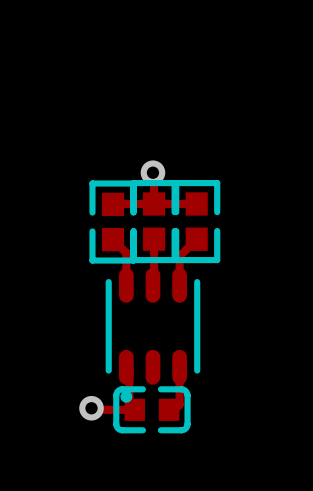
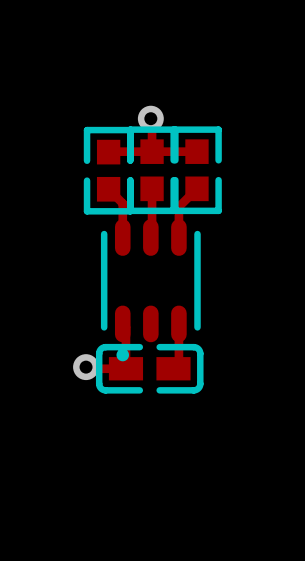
part footprint: [113, 386, 191, 434] -> [95, 343, 204, 394]

